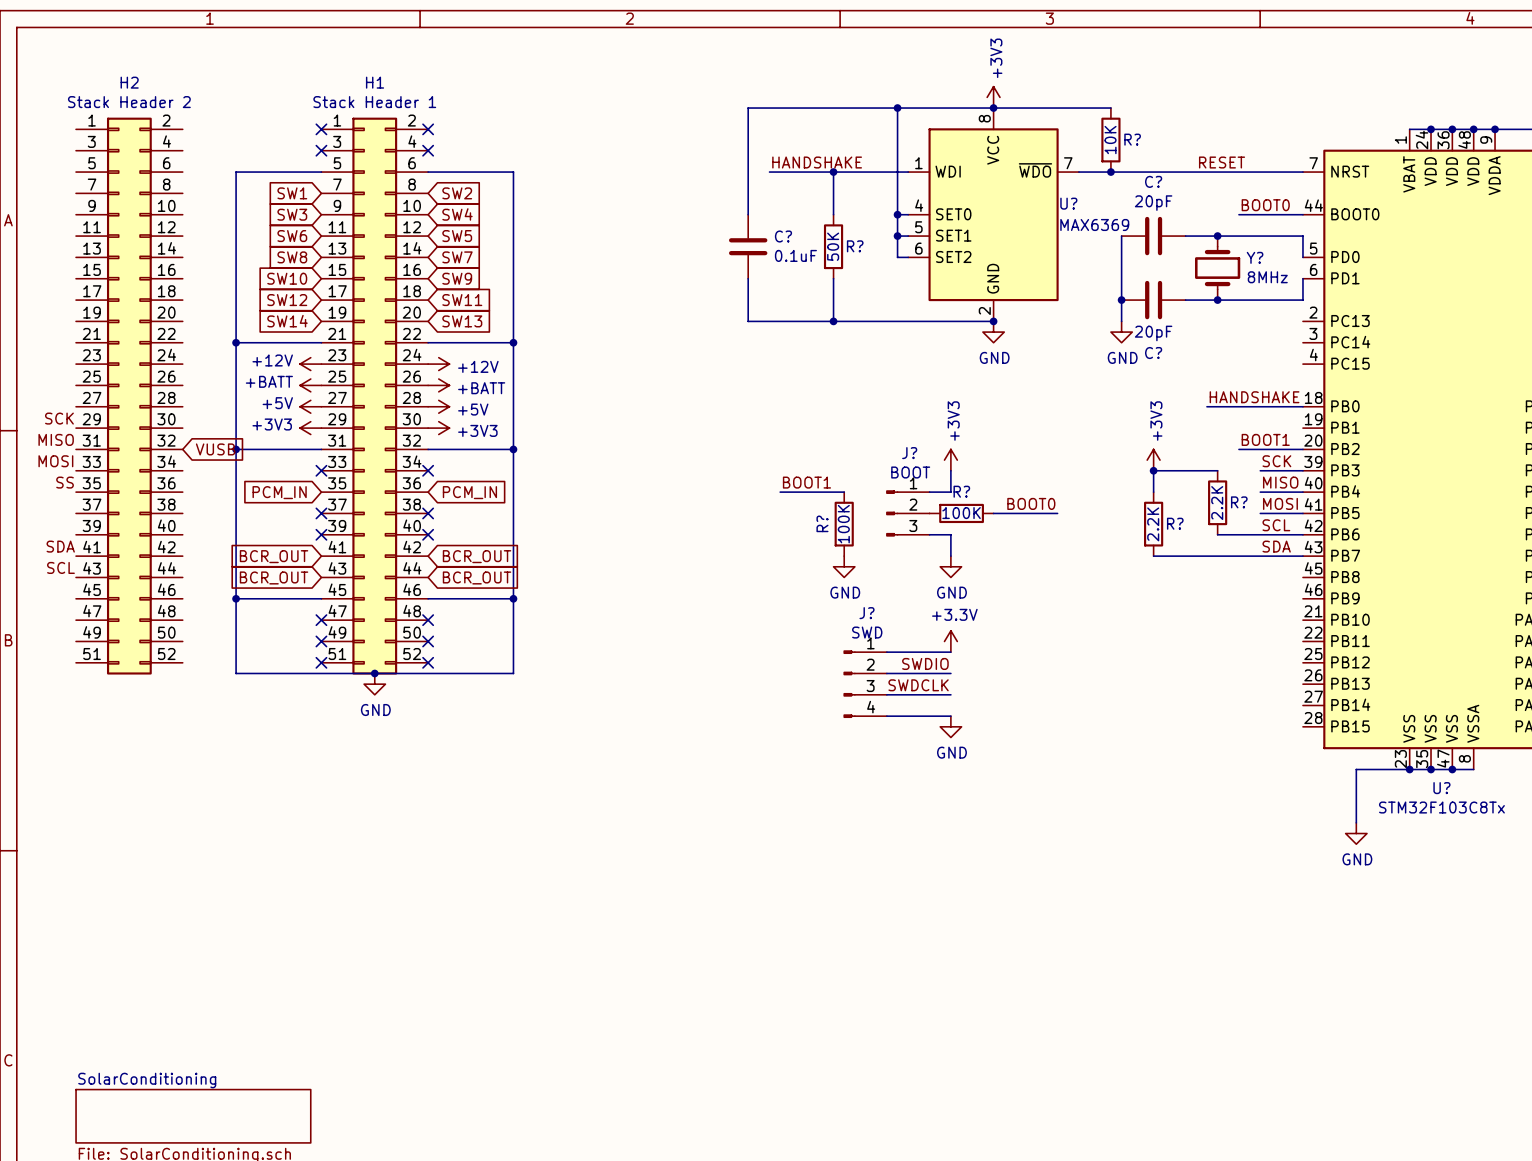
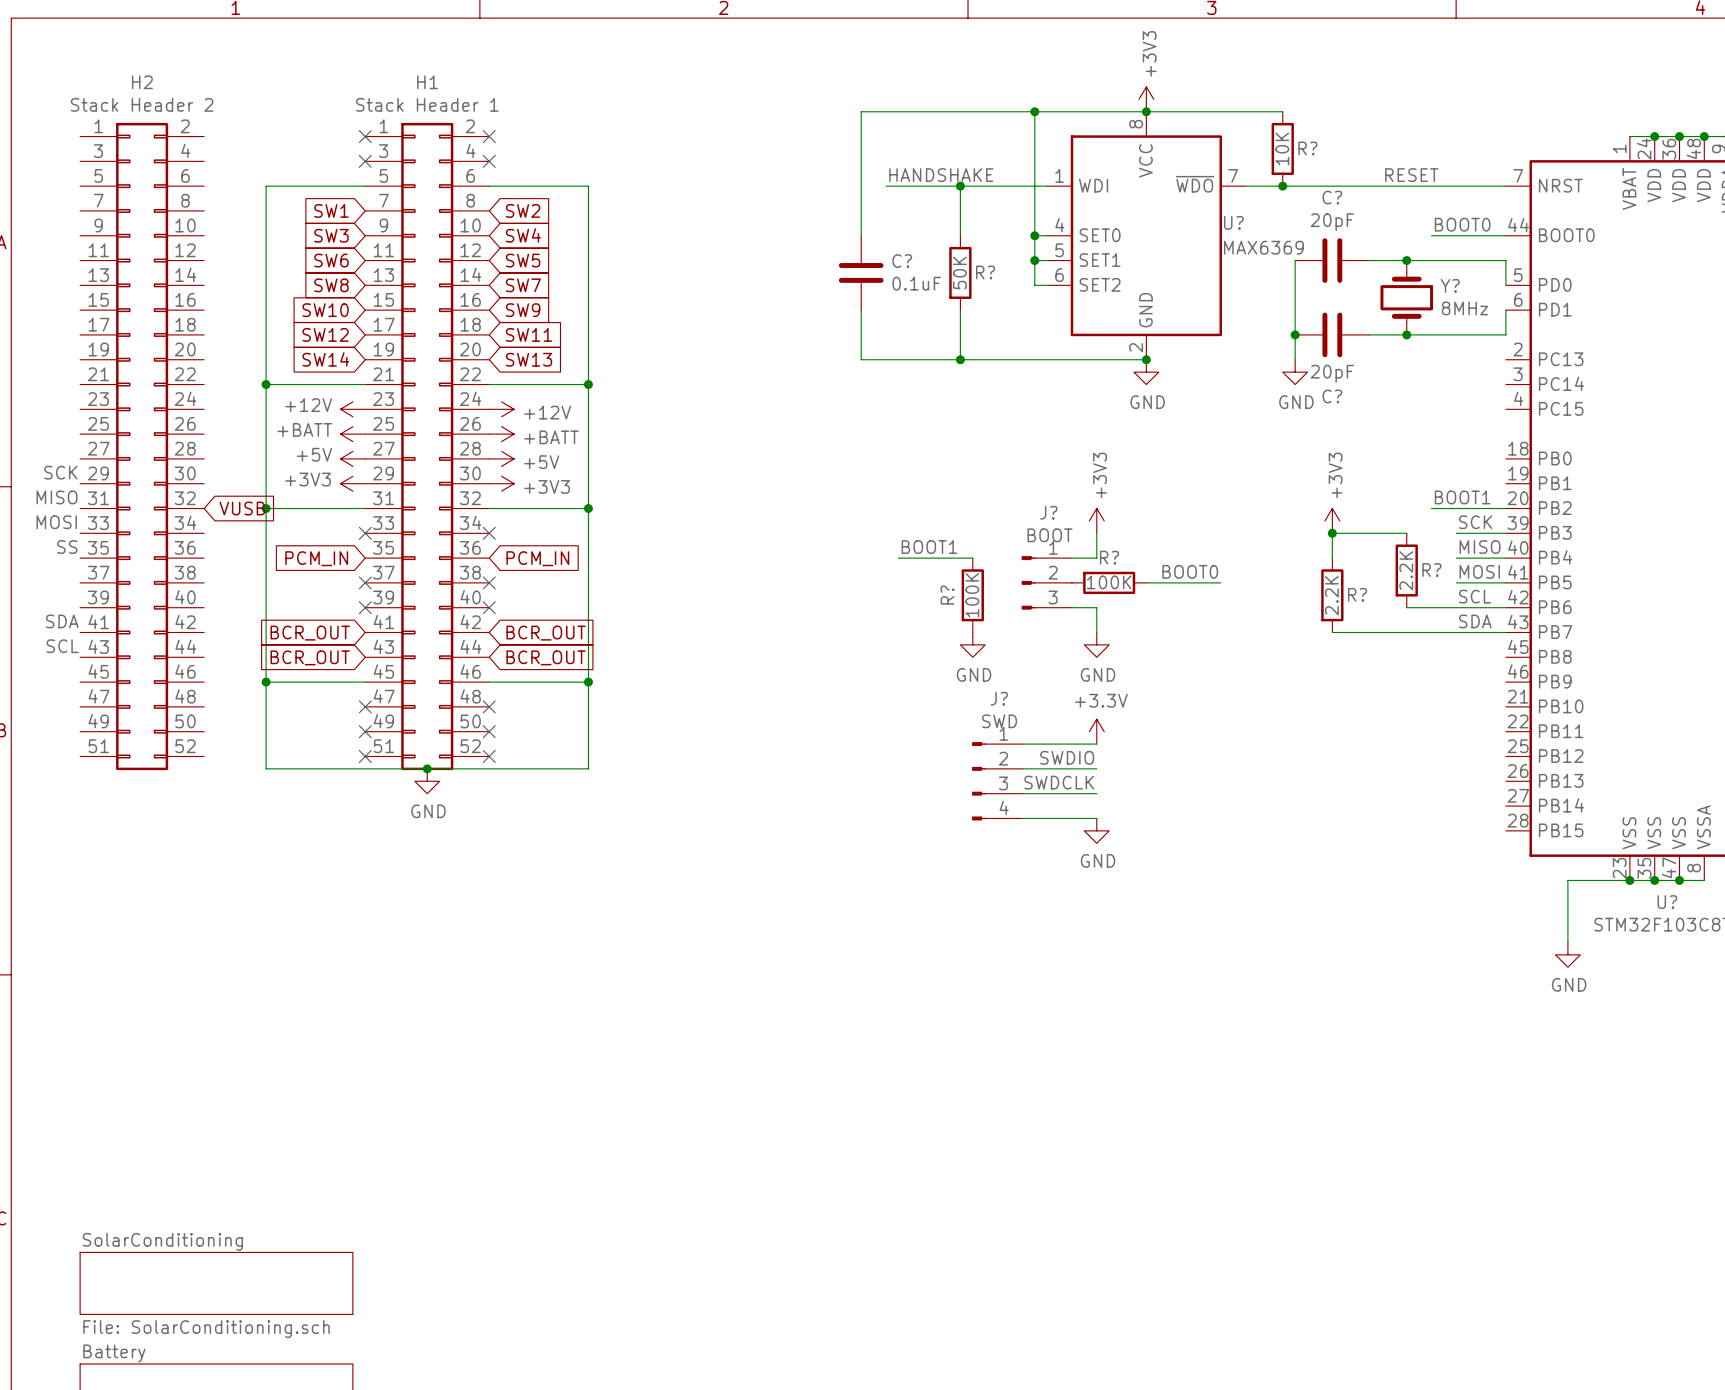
label: HANDSHAKE (1254, 397) -> none
wire: (1206, 406) (1302, 406) -> none

